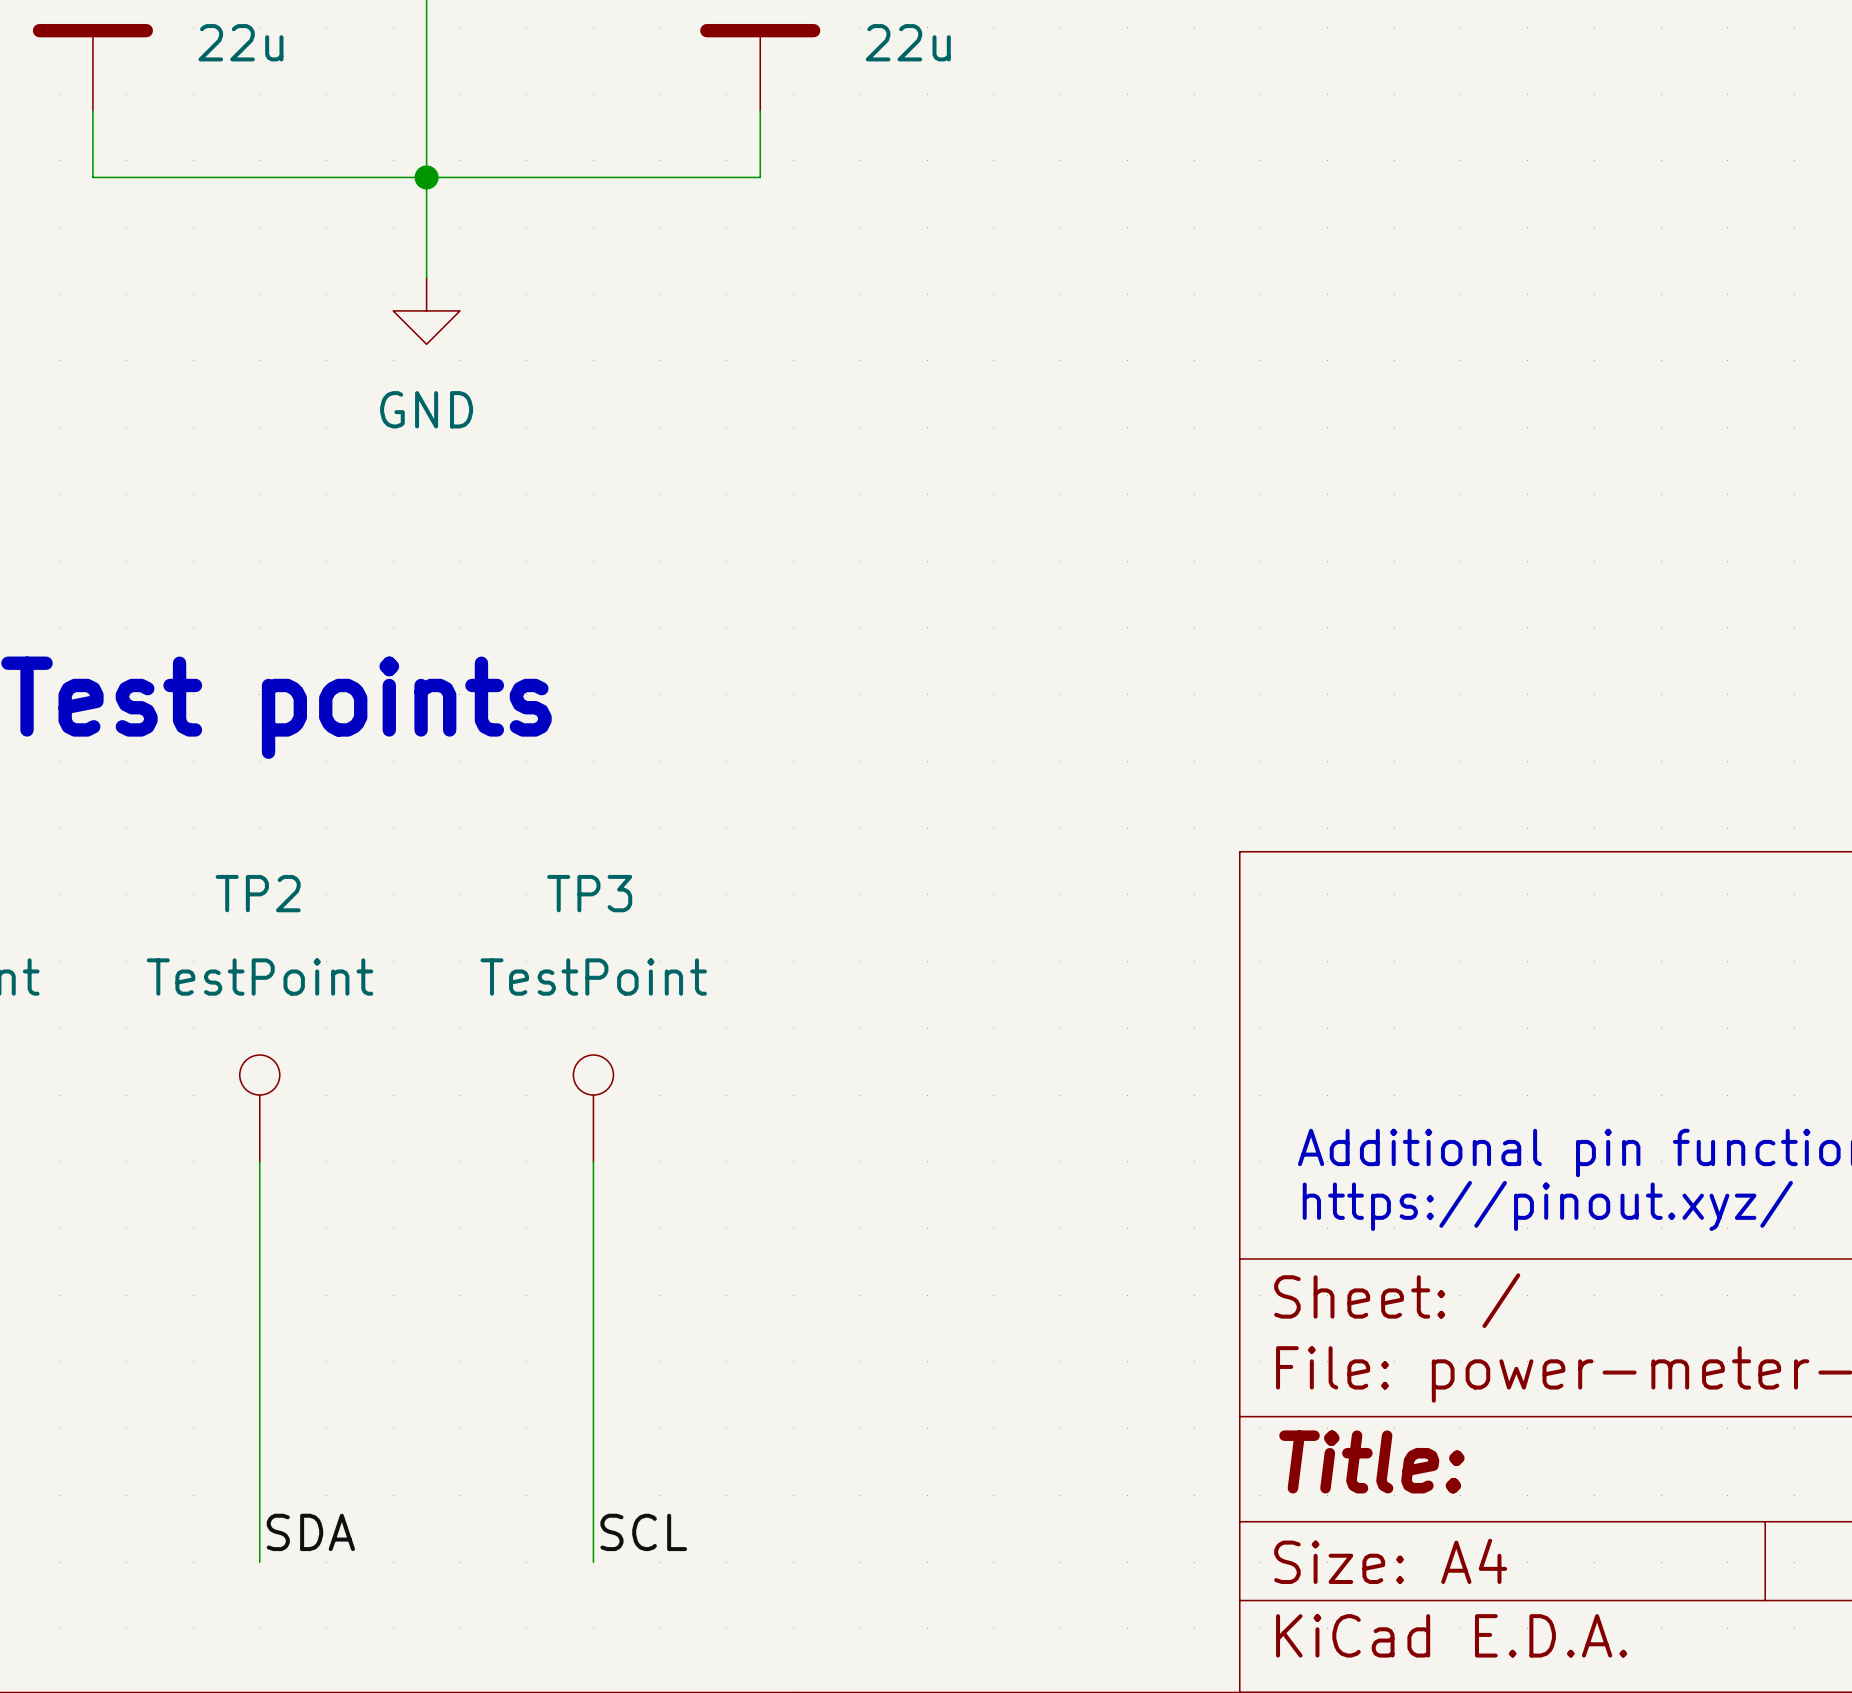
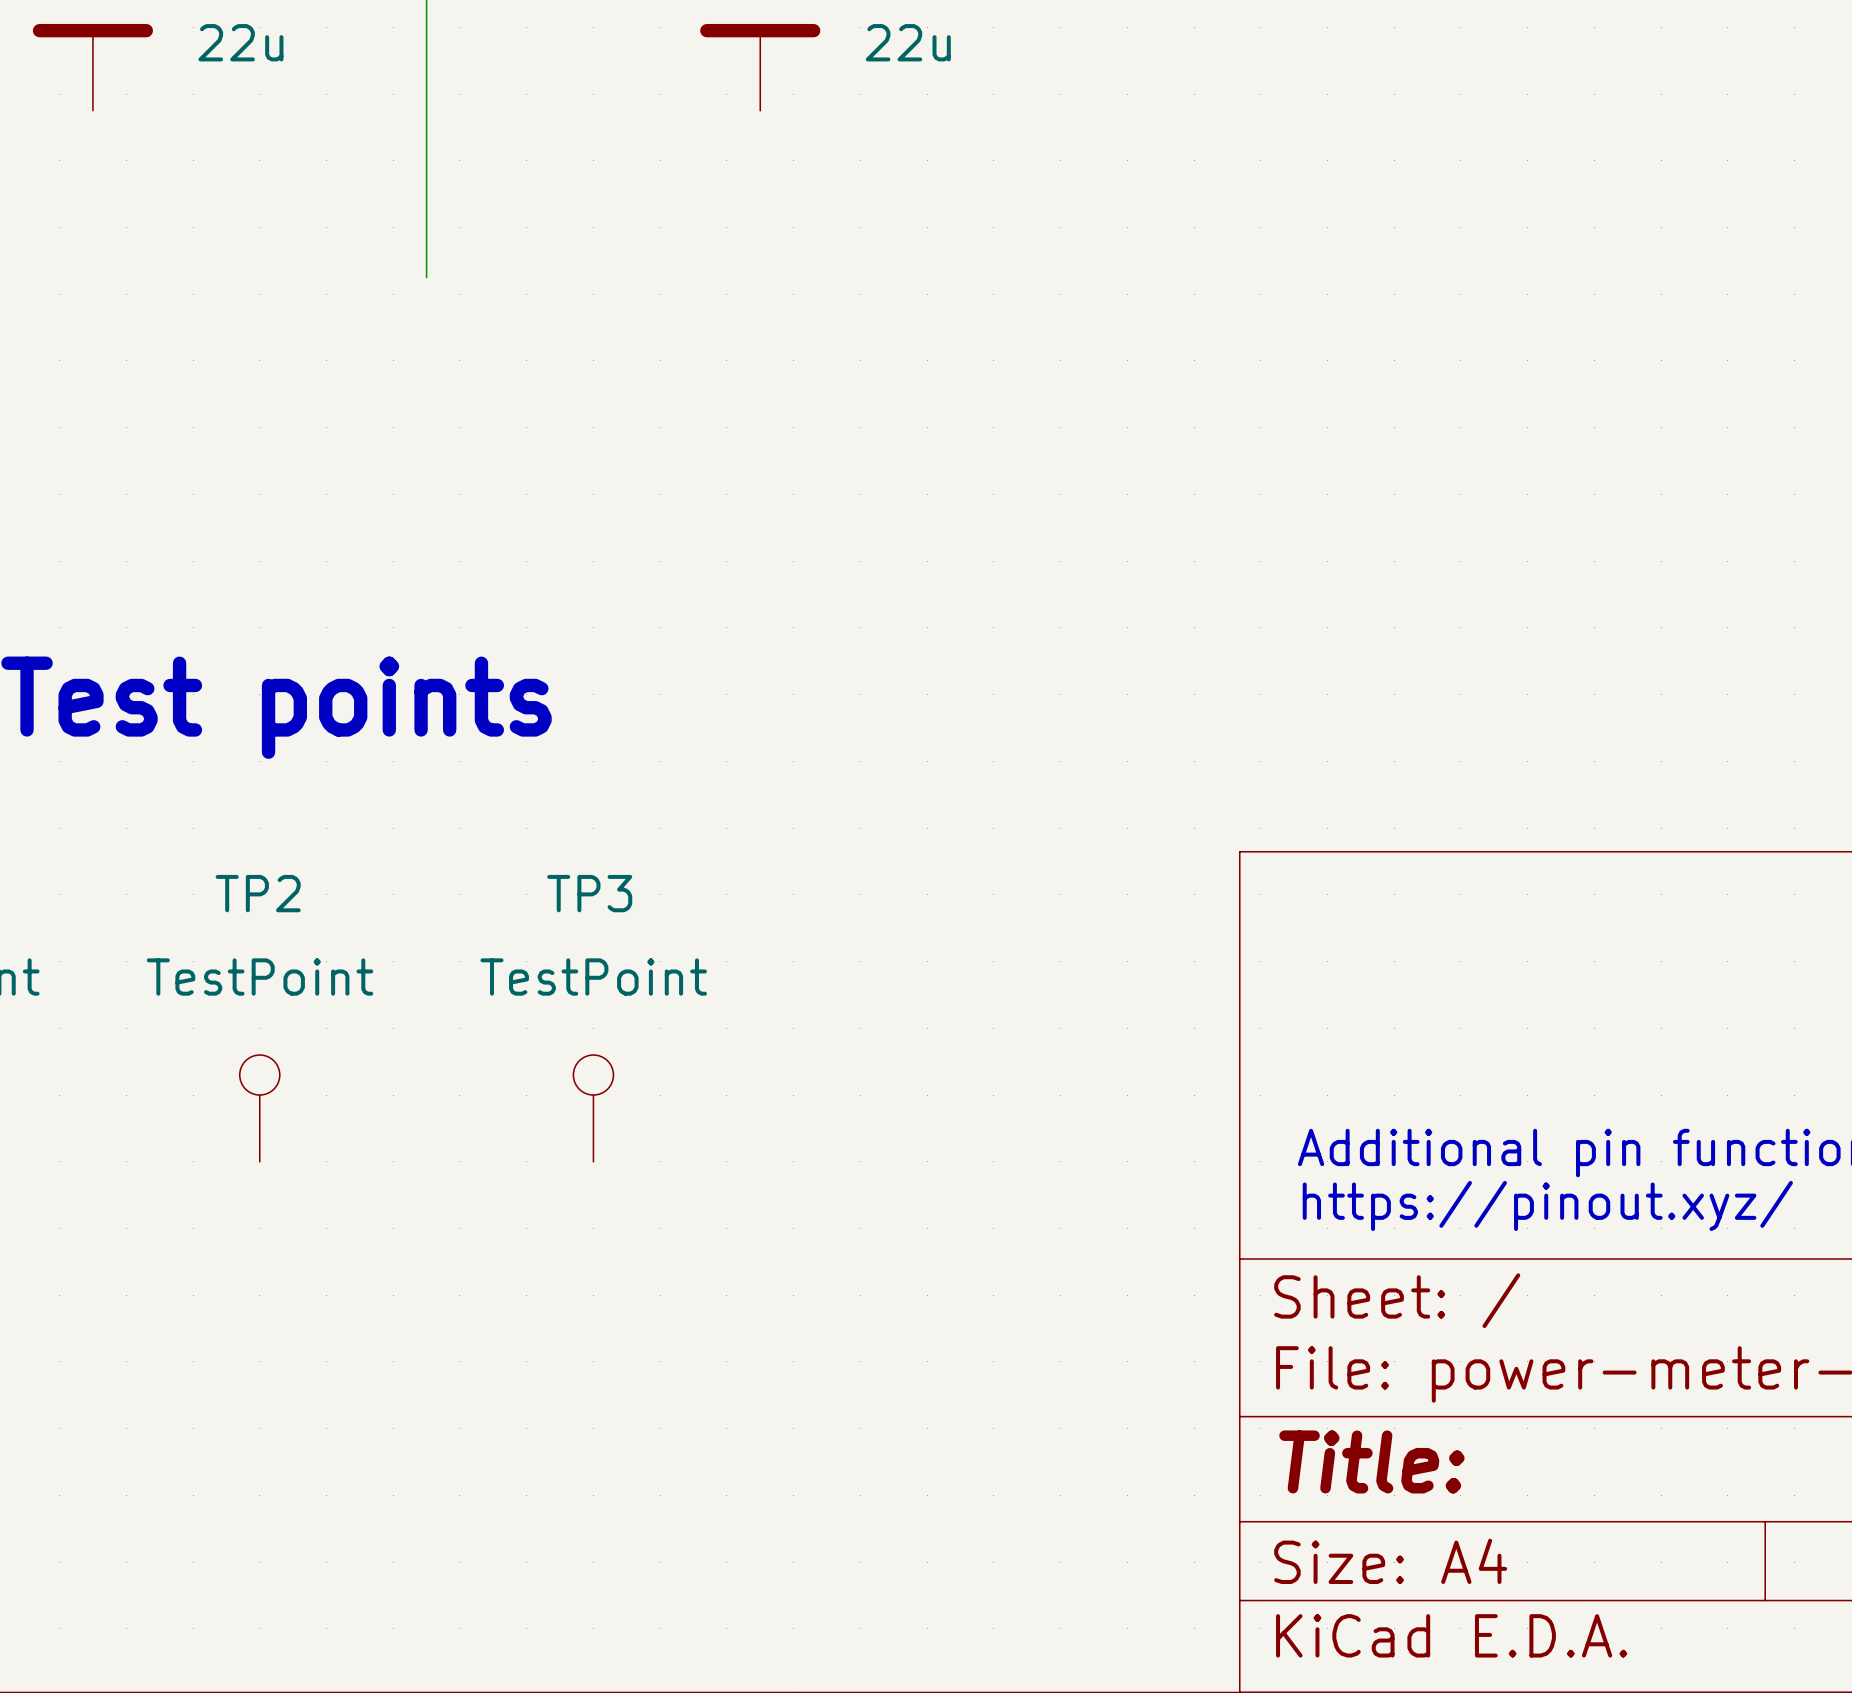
wire: (92, 110) (92, 177) (760, 177) (760, 110) -> none
junction: (426, 177) -> none
power symbol: GND (426, 310) -> none
wire: (259, 1161) (259, 1562) -> none
wire: (593, 1161) (593, 1562) -> none
label: SDA (310, 1532) -> none
label: SCL (643, 1532) -> none

